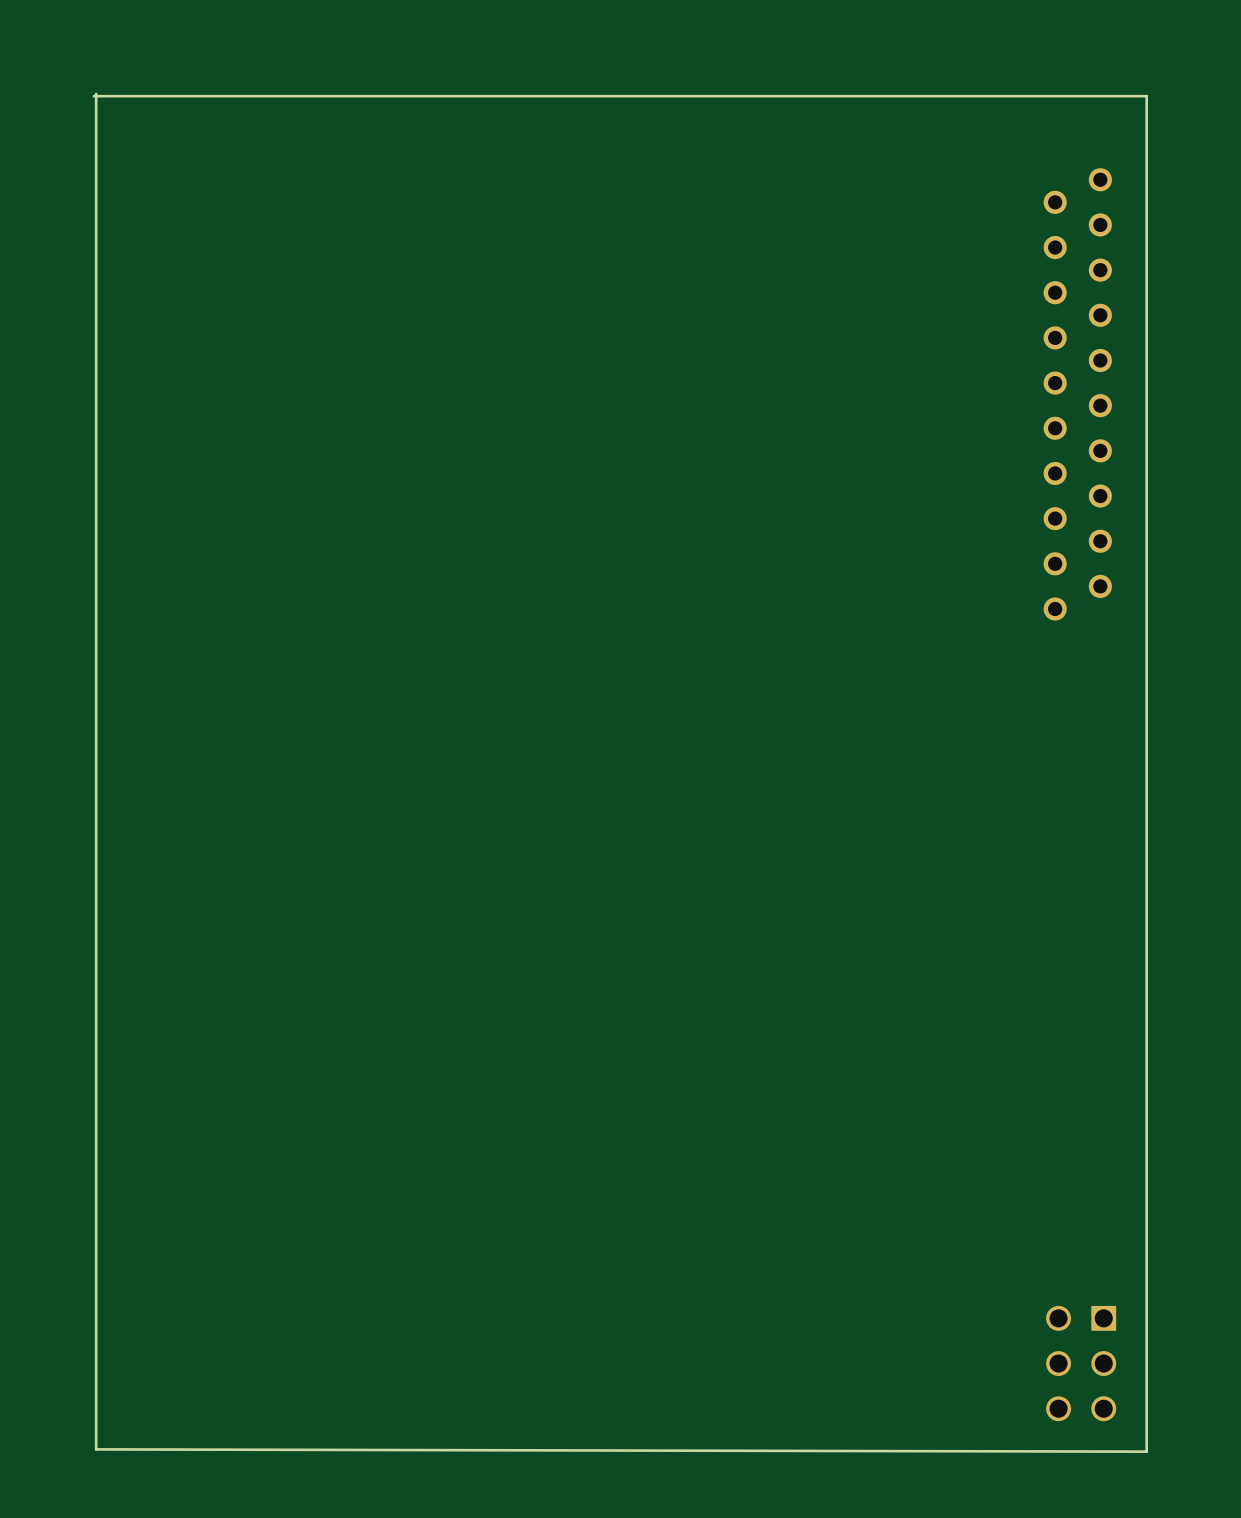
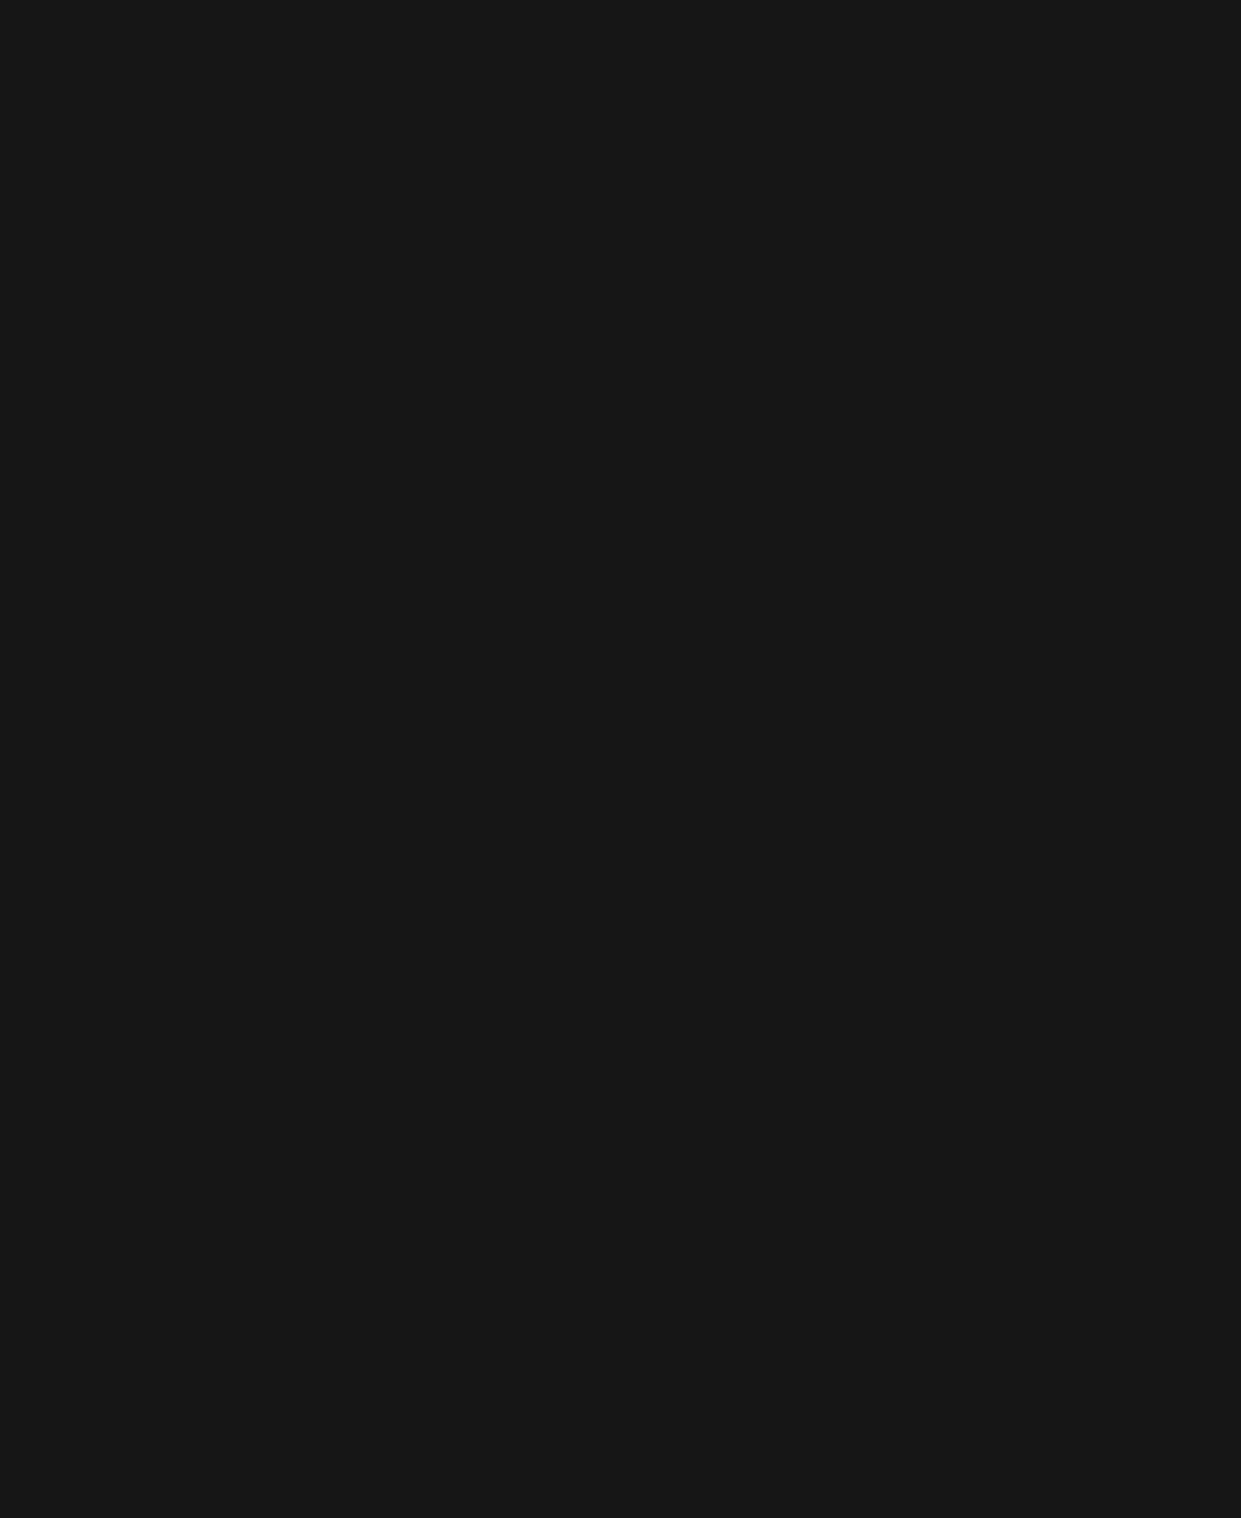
board edge: (96, 93) (96, 1449) (1146, 1451) (1146, 96) (93, 96) -> none
part: (1077, 394) -> none
part: (1081, 1363) -> none

